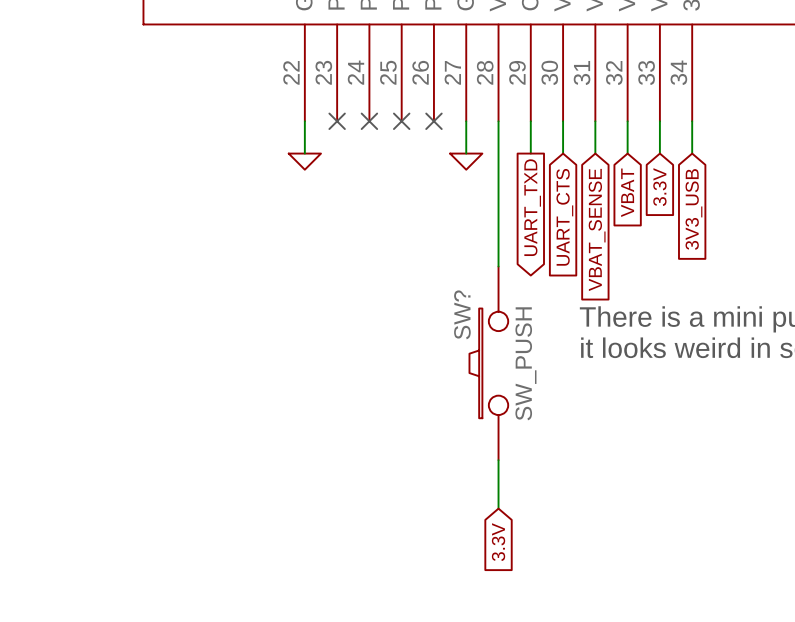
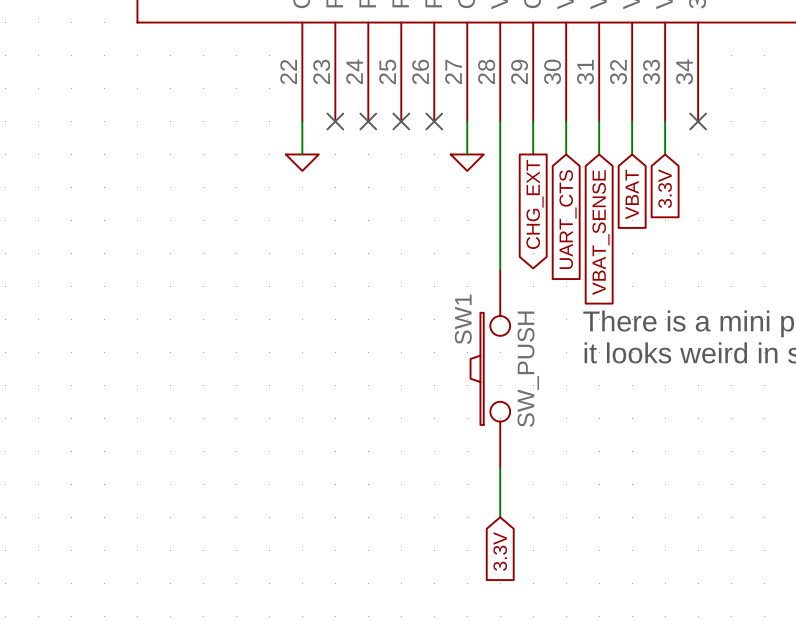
wire: (692, 121) (692, 153) -> none
no-connect mark: none -> (698, 121)
global label: UART_TXD (532, 207) -> CHG_EXT (535, 204)
global label: 3V3_USB (693, 209) -> none
SW? name: SW? (462, 314) -> SW1 (463, 319)

